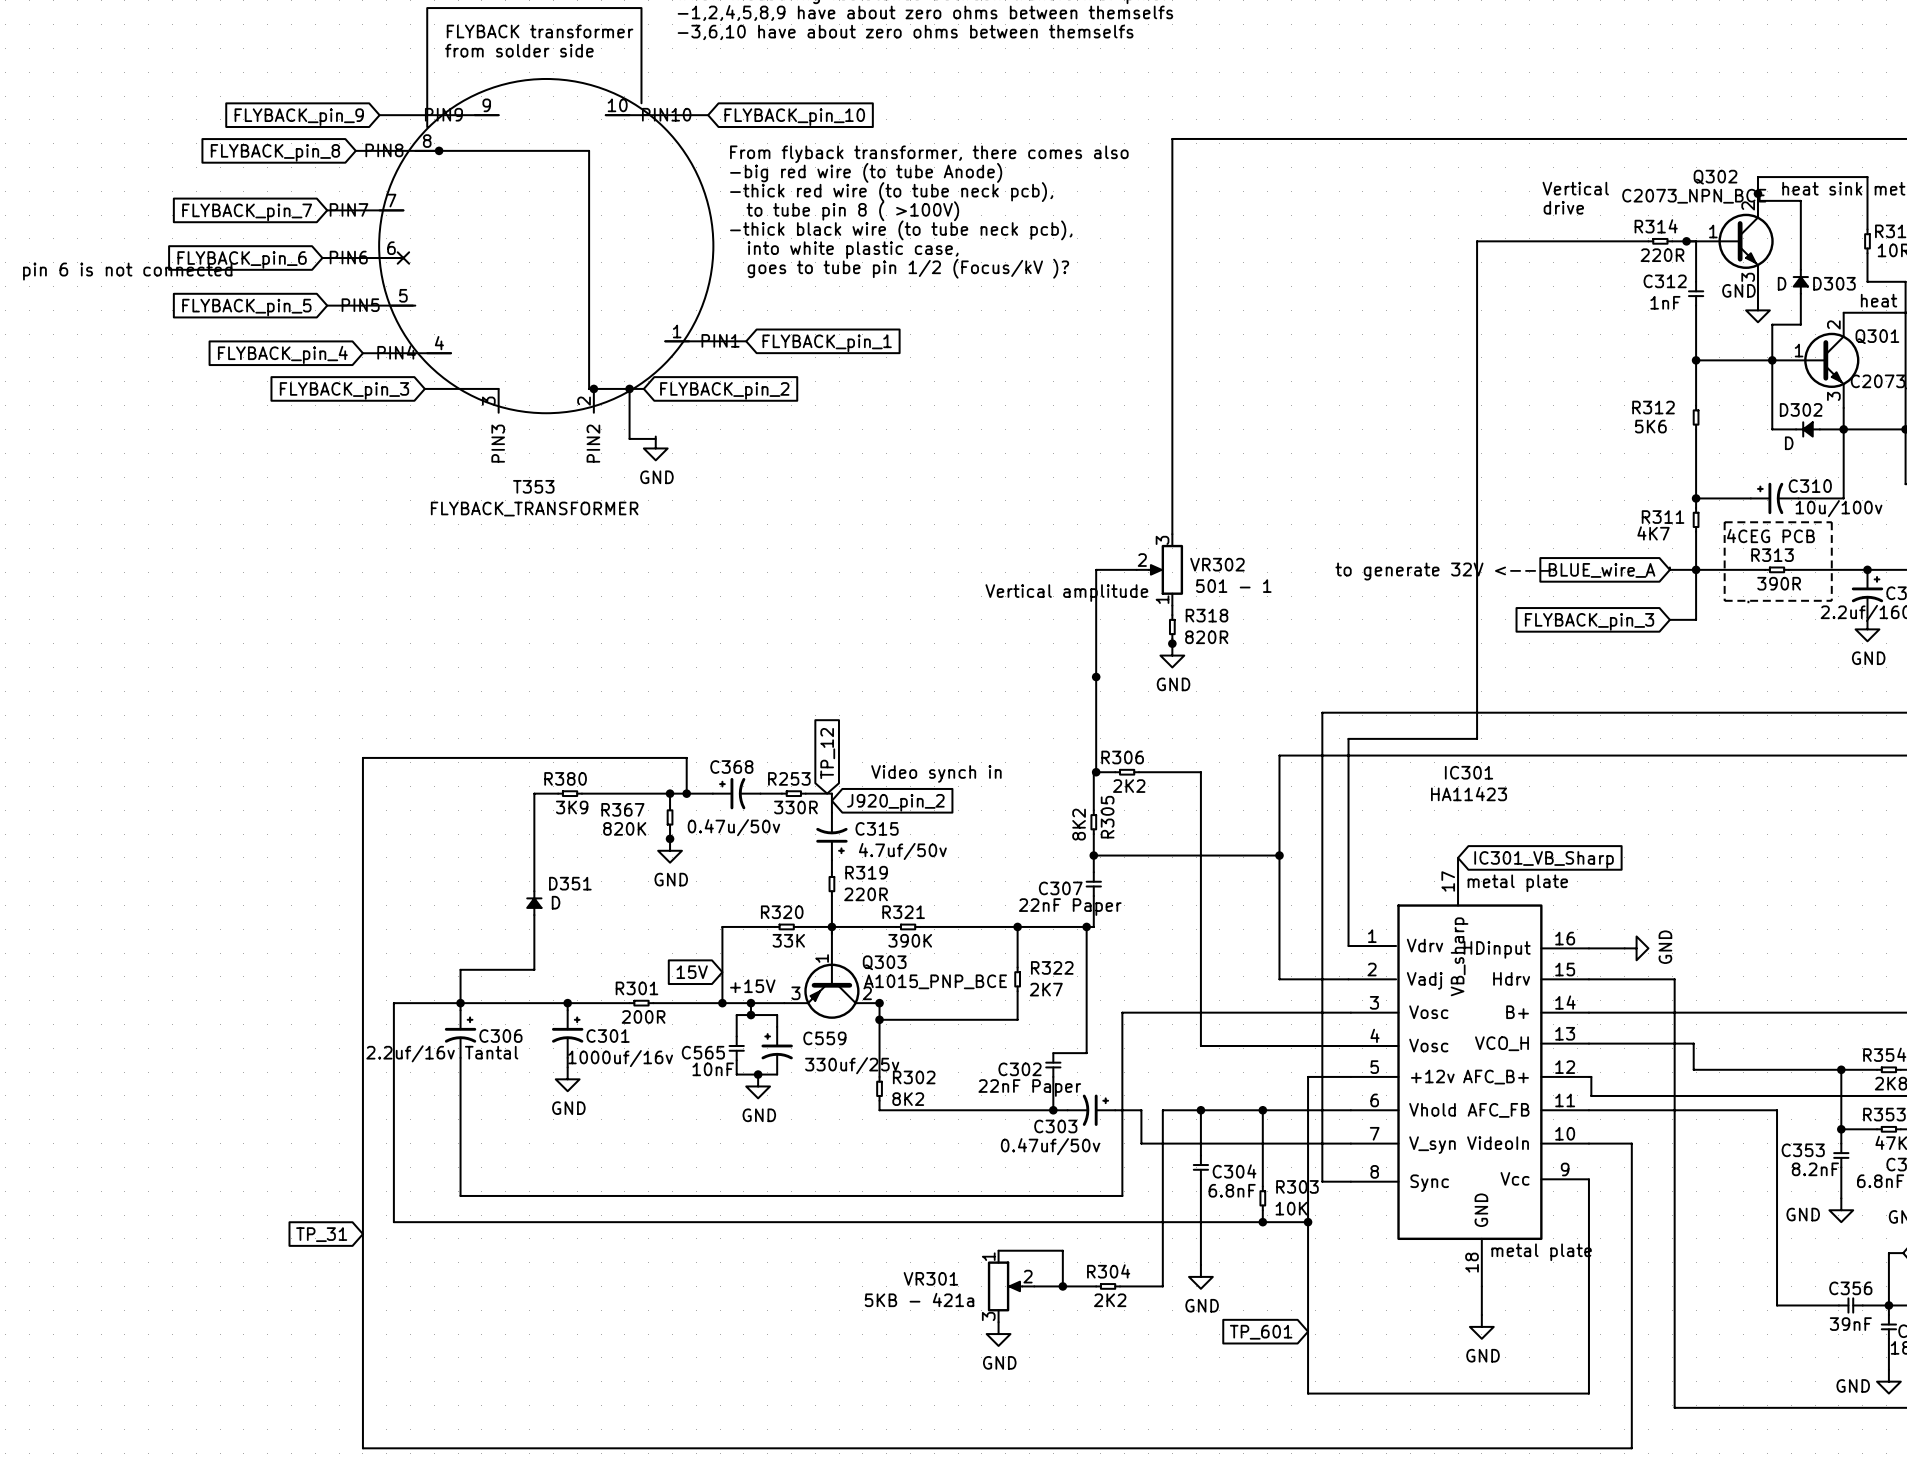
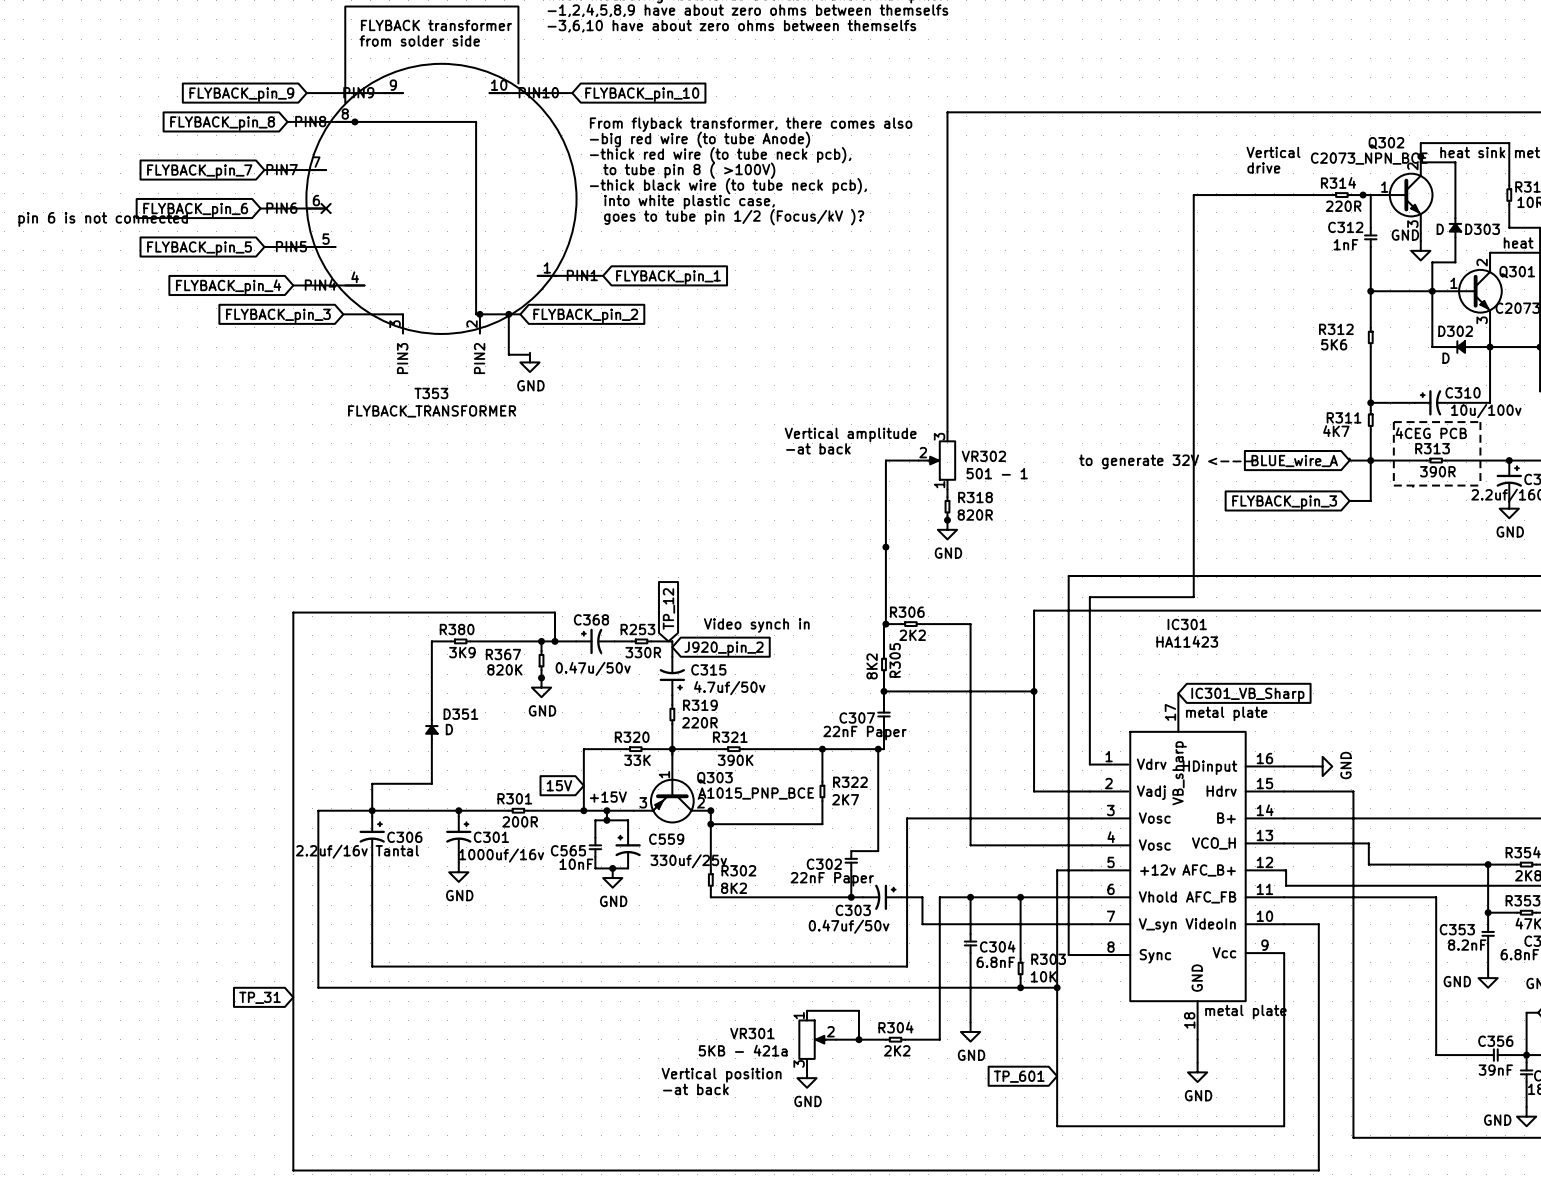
text: none -> -at back (818, 448)
text position: Vertical amplitude (1066, 593) -> Vertical amplitude (850, 434)
text: none -> Vertical position (721, 1075)
text: none -> -at back (695, 1089)

